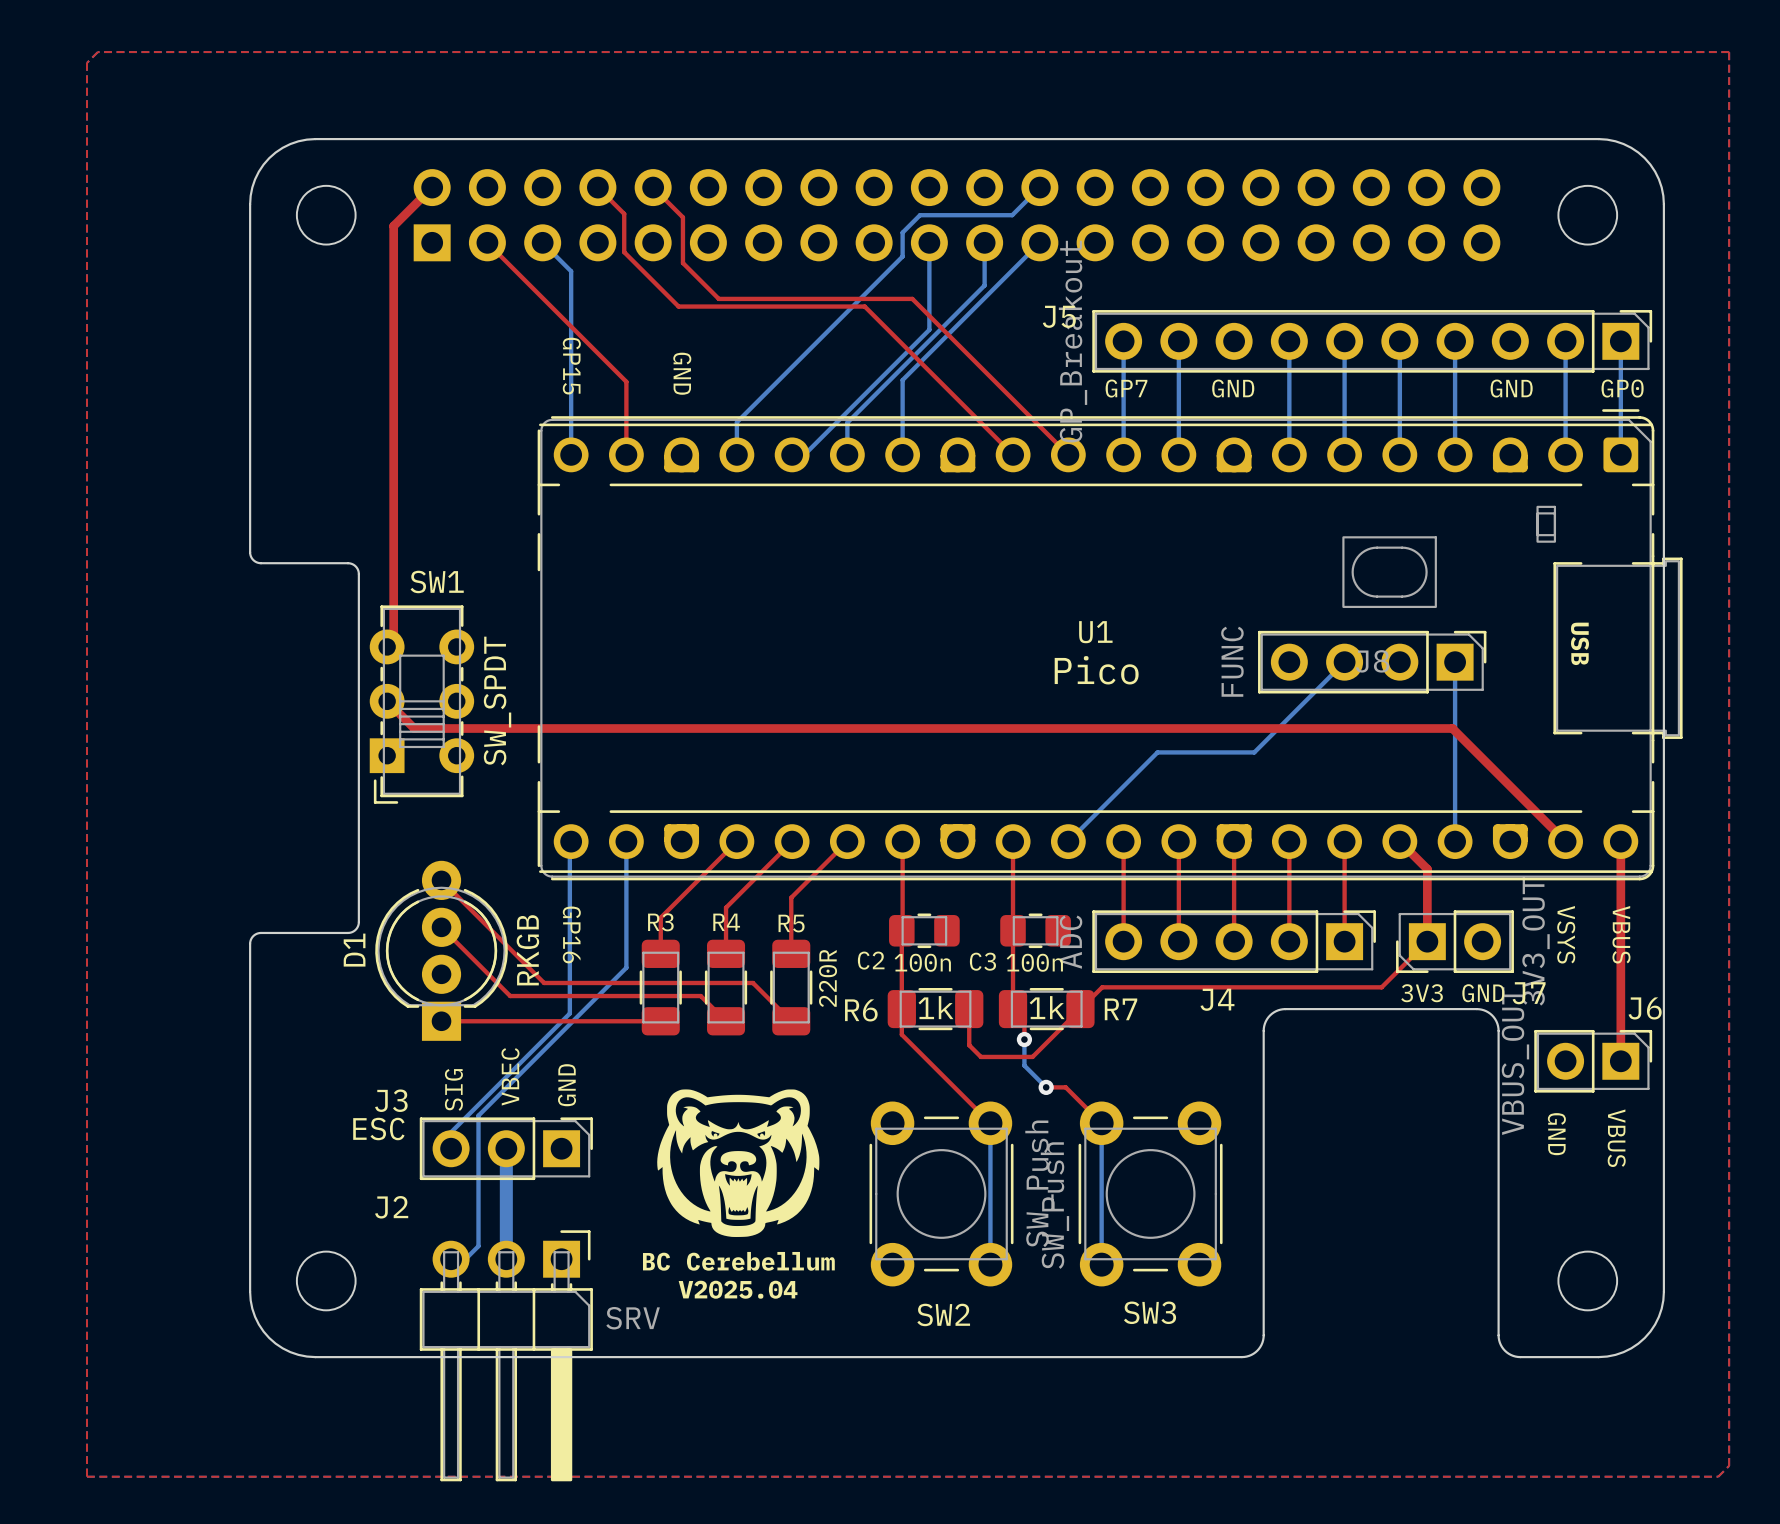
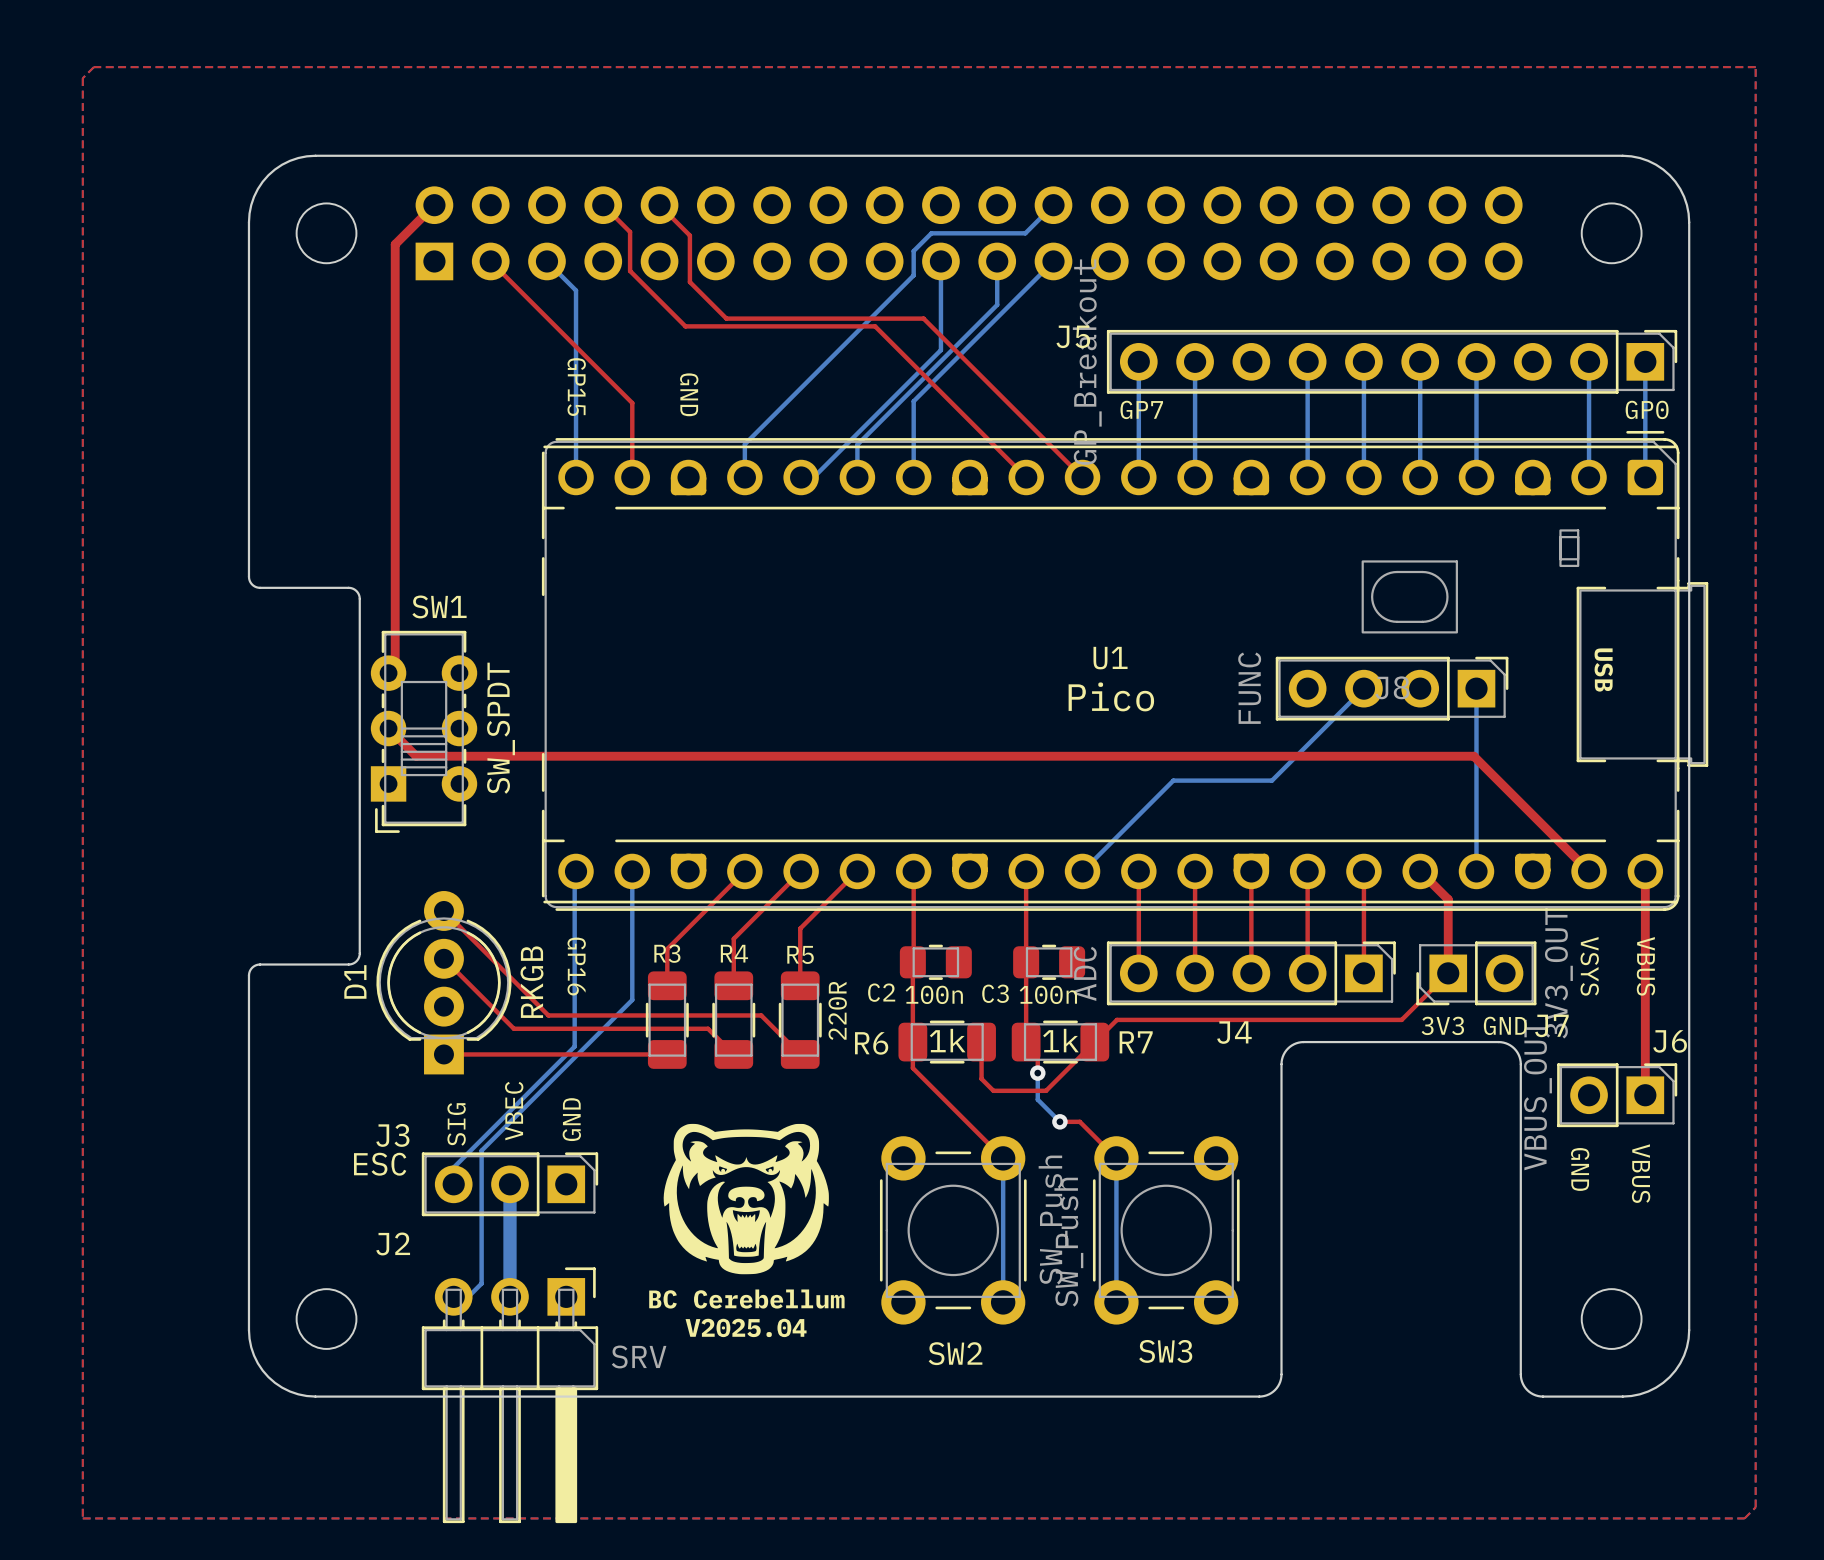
text: GND (1233, 388) -> none
text: GND (1511, 388) -> none

